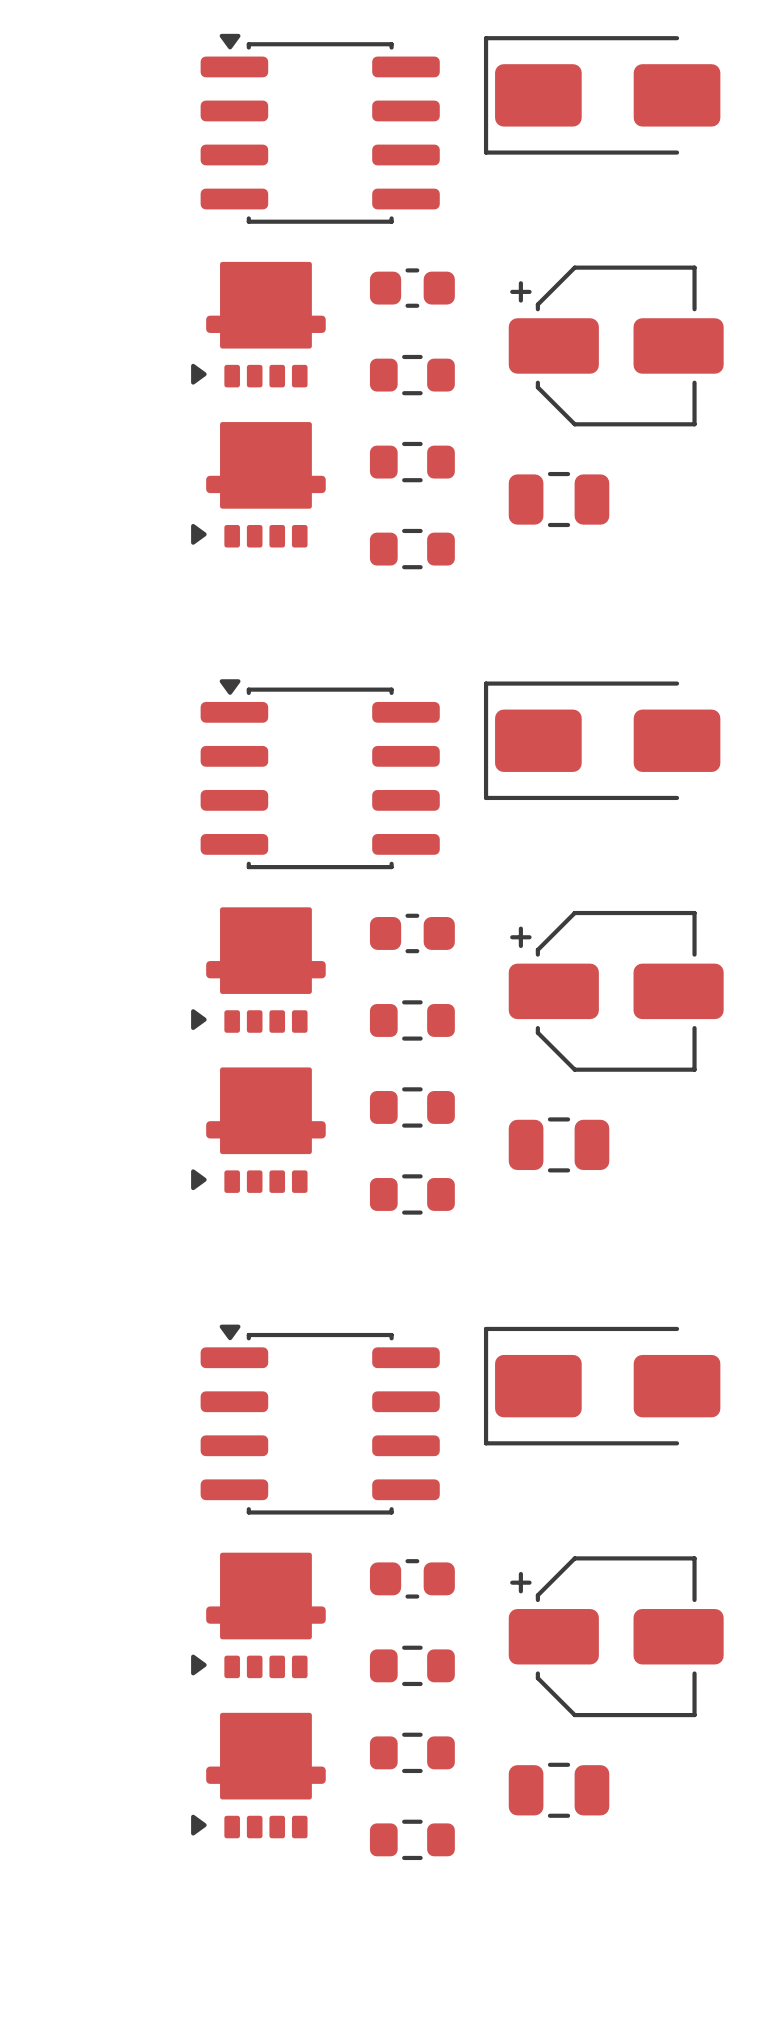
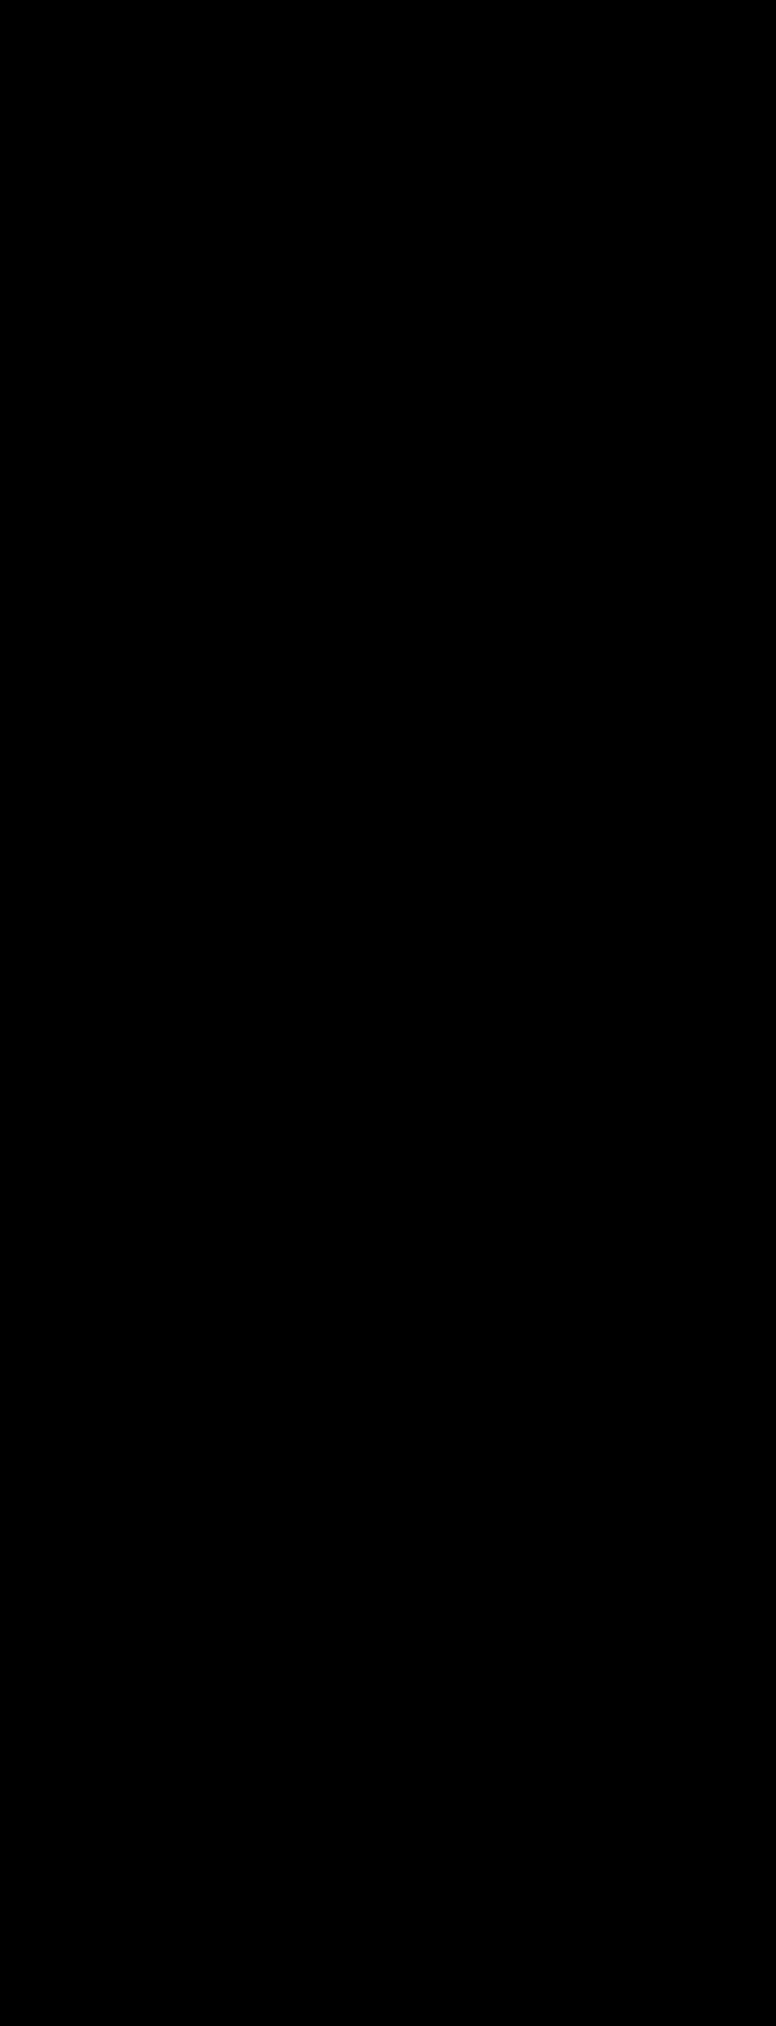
part: (602, 95) -> none
part: (320, 128) -> none
part: (412, 288) -> none
part: (258, 324) -> none
part: (616, 345) -> none
part: (412, 375) -> none
part: (412, 462) -> none
part: (258, 484) -> none
part: (559, 499) -> none
part: (412, 549) -> none
part: (602, 740) -> none
part: (320, 774) -> none
part: (412, 933) -> none
part: (258, 970) -> none
part: (616, 991) -> none
part: (412, 1020) -> none
part: (412, 1107) -> none
part: (258, 1130) -> none
part: (559, 1144) -> none
part: (412, 1194) -> none
part: (602, 1386) -> none
part: (320, 1419) -> none
part: (412, 1578) -> none
part: (258, 1615) -> none
part: (616, 1636) -> none
part: (412, 1665) -> none
part: (412, 1752) -> none
part: (258, 1775) -> none
part: (559, 1790) -> none
part: (412, 1839) -> none

